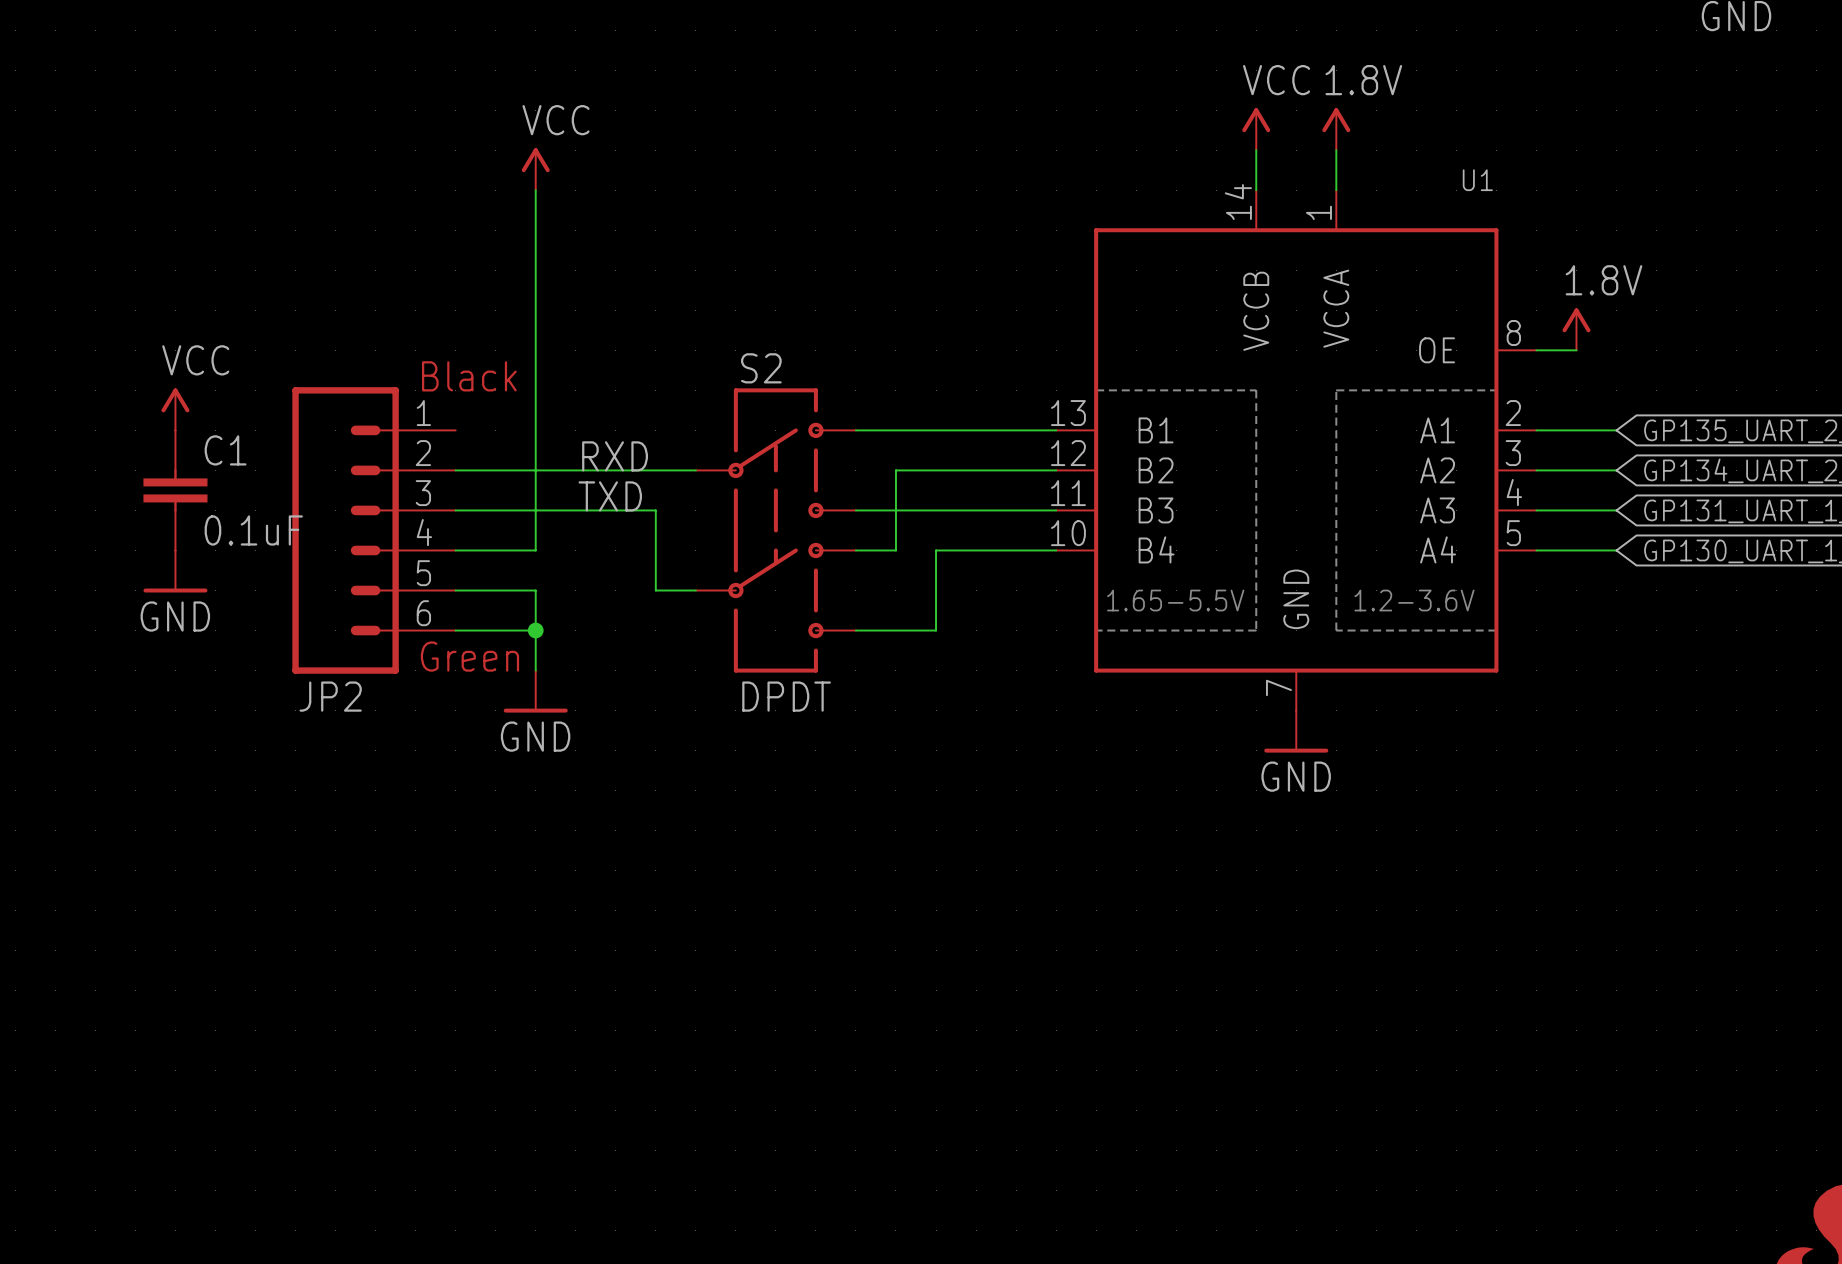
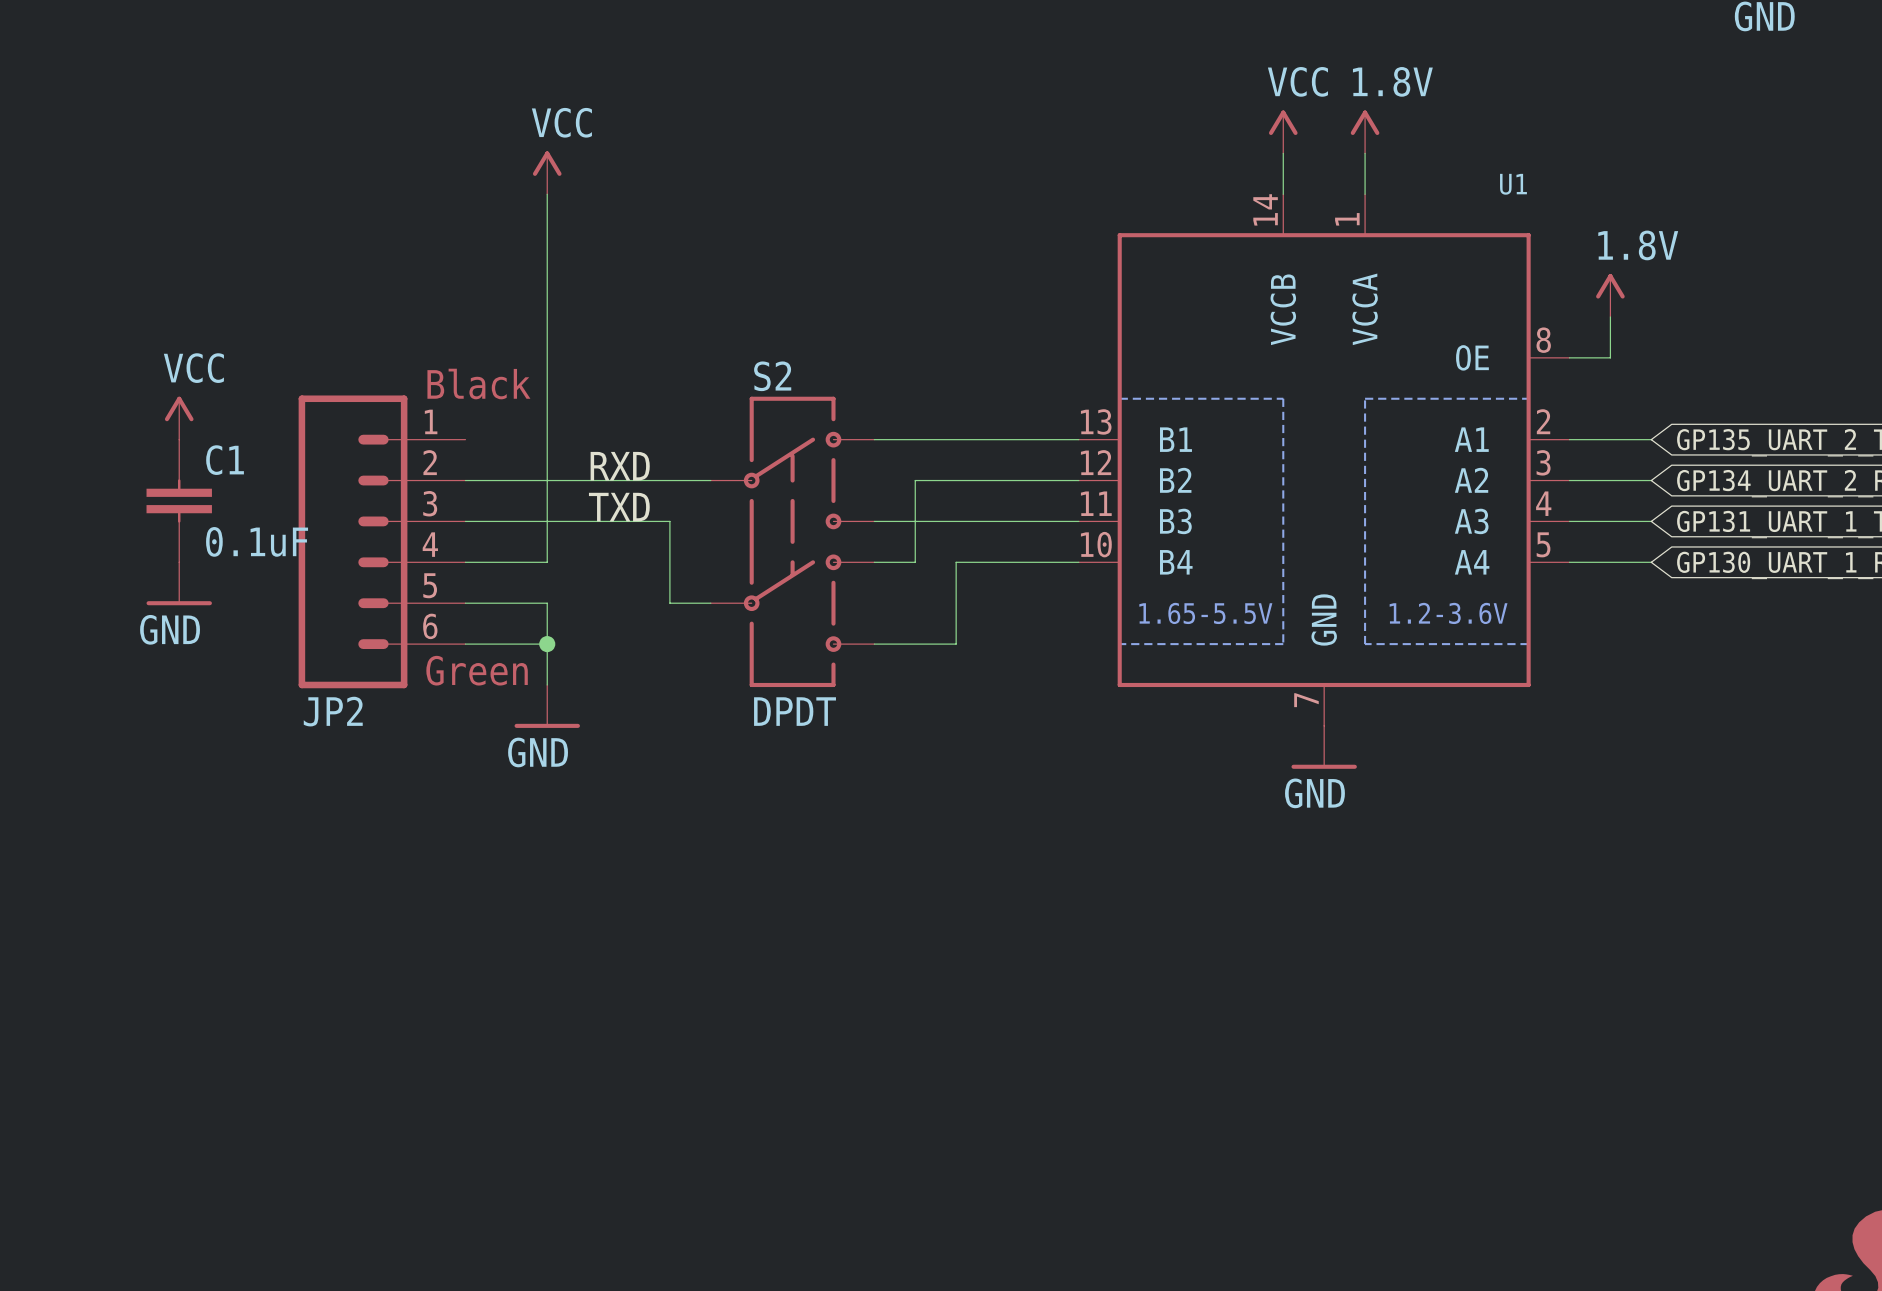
power symbol position: 1.8V (1576, 329) -> 1.8V (1610, 295)

